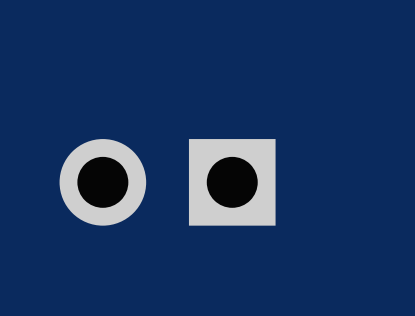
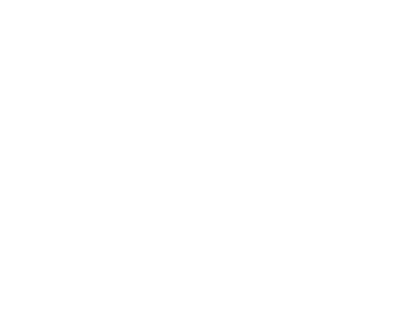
part: (167, 182) -> none

